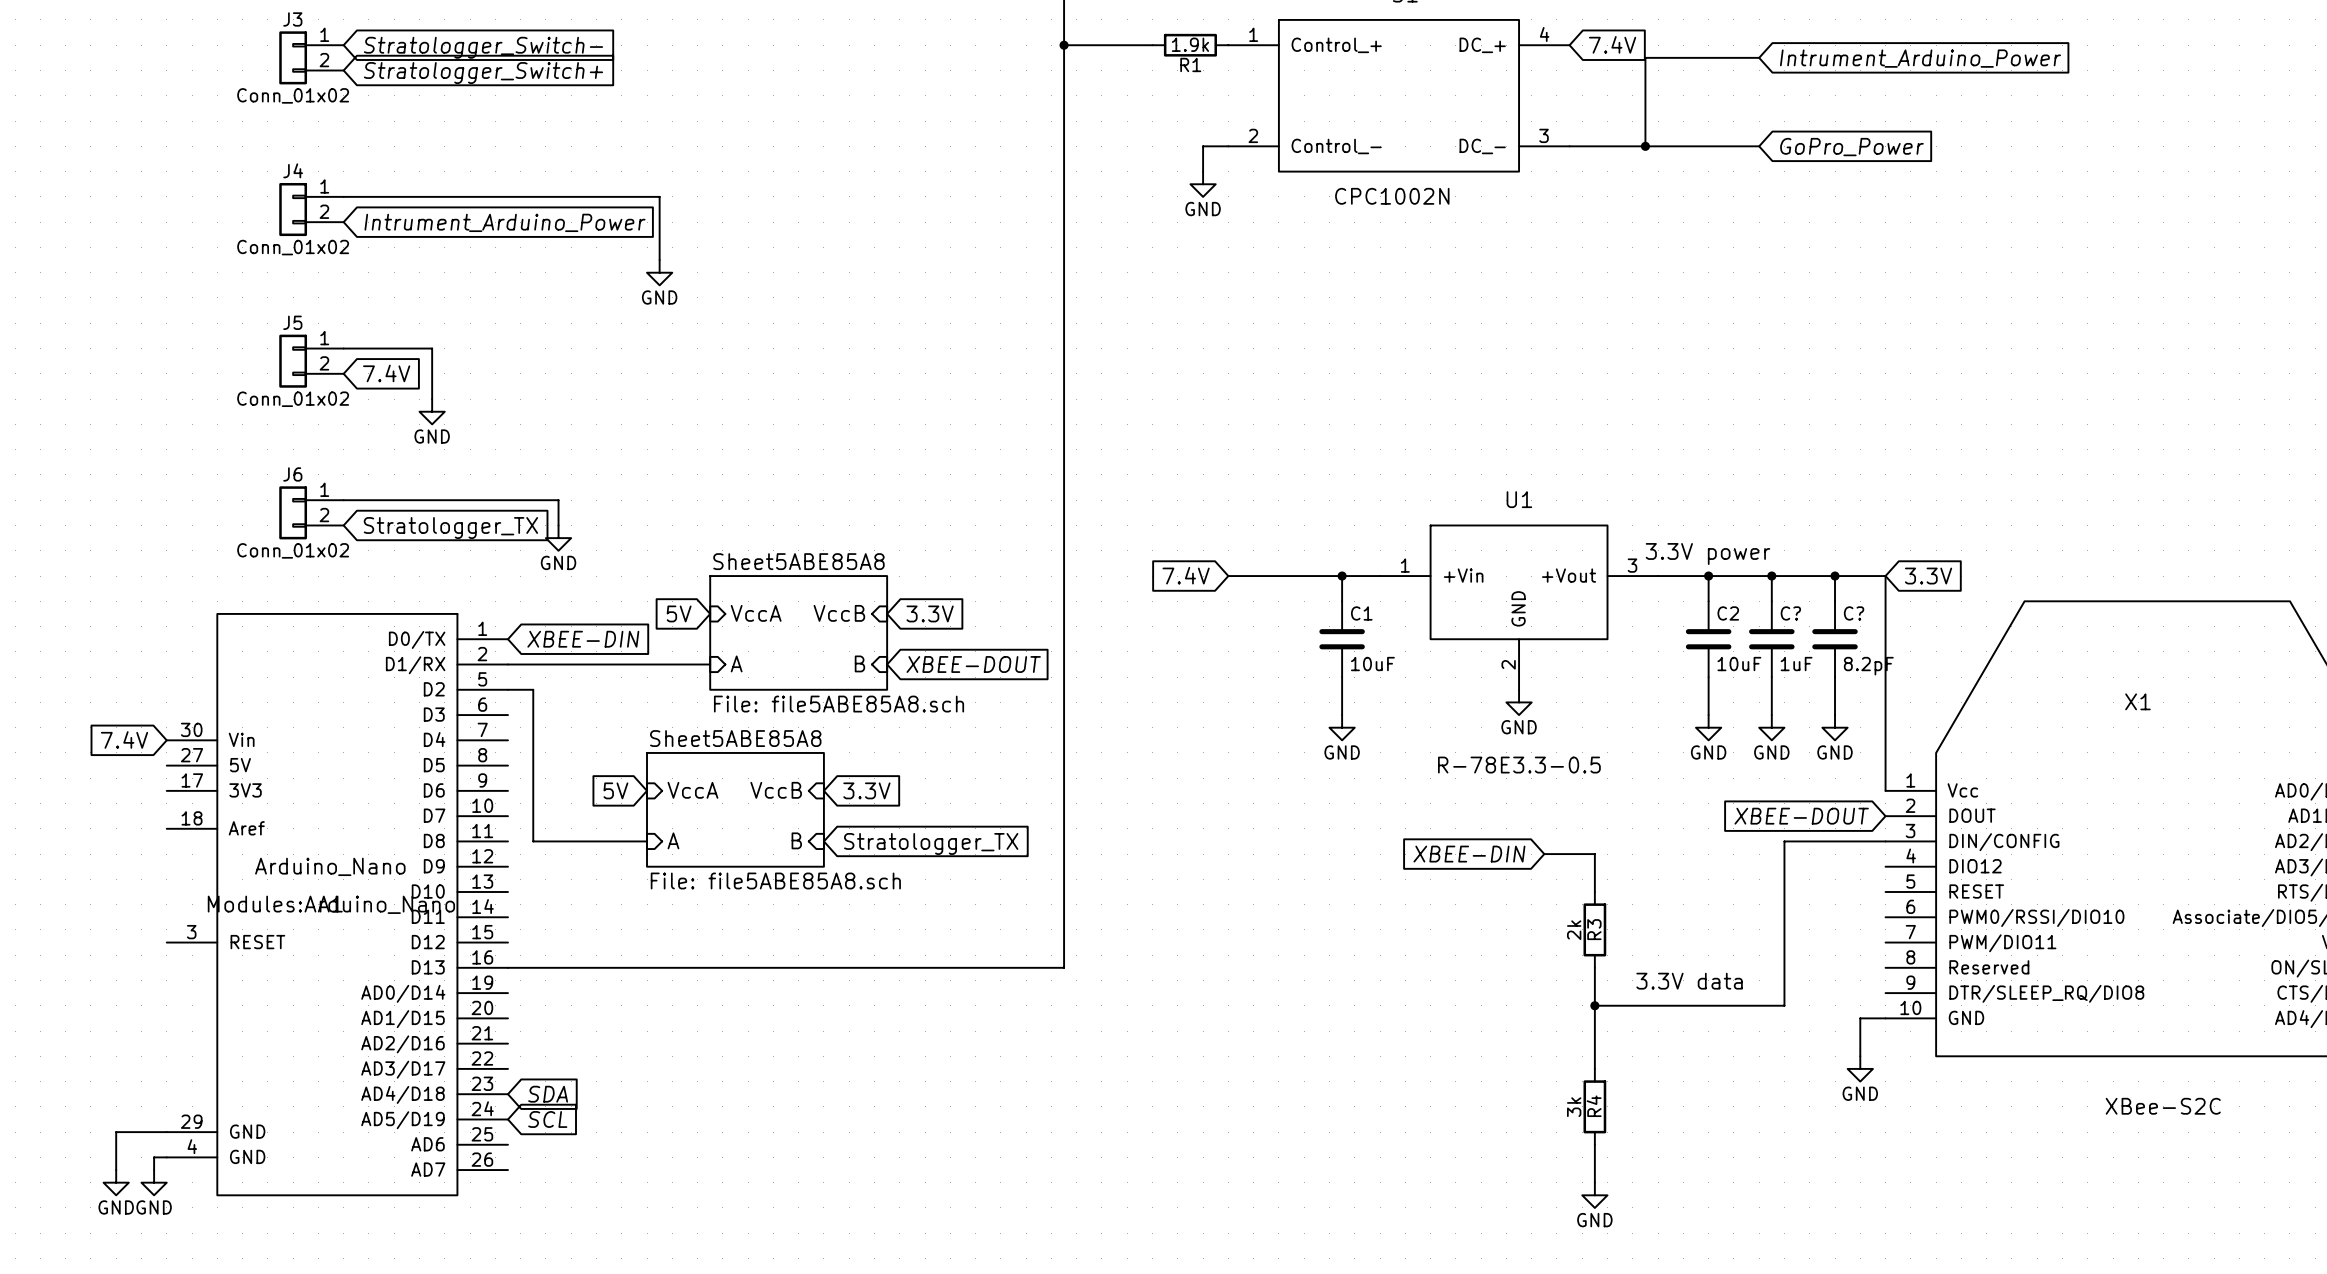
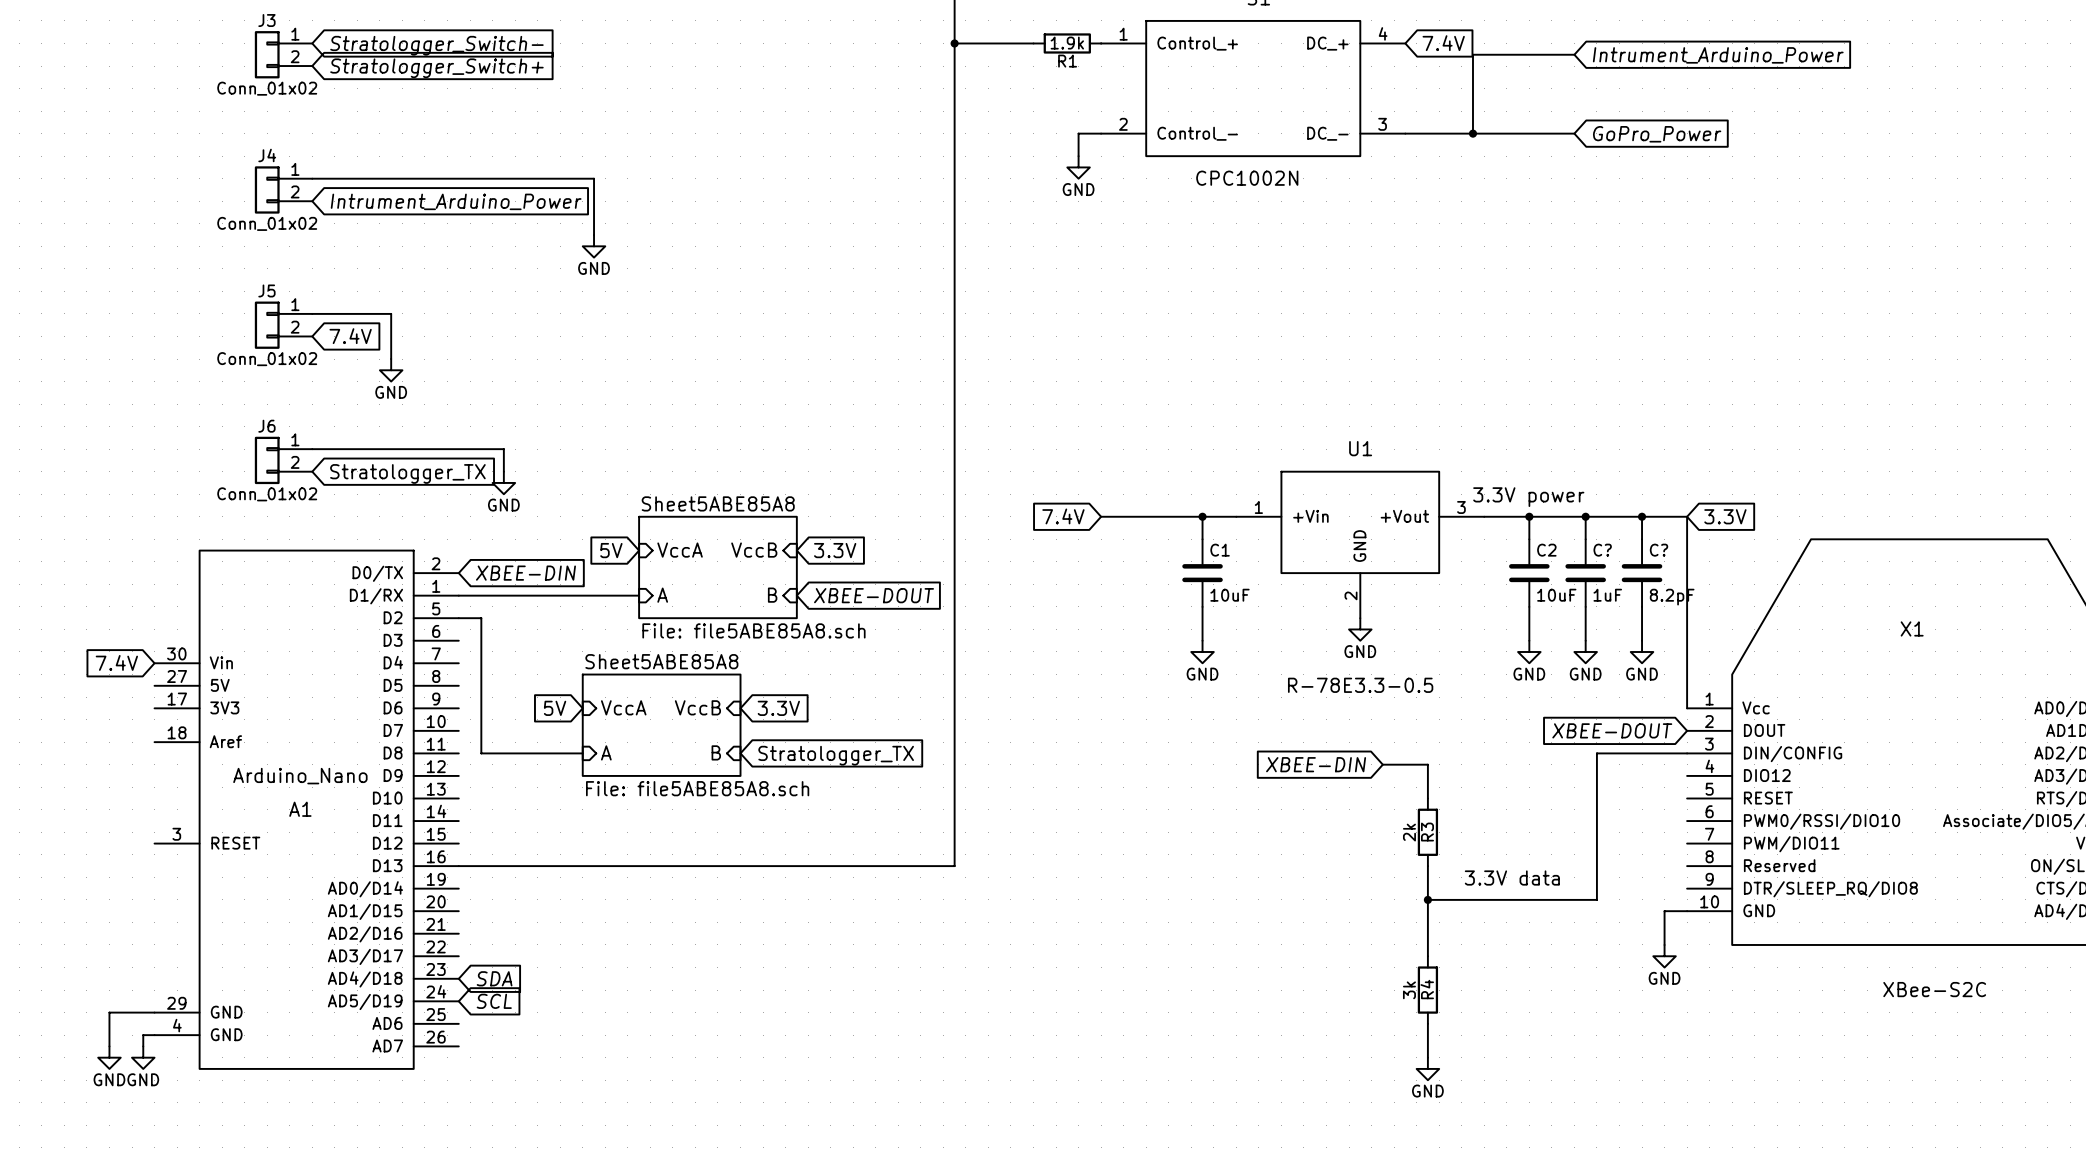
A1 pin number: 1 (482, 628) -> 2 (435, 563)
A1 pin number: 2 (482, 654) -> 1 (436, 586)
A1 text: Modules:Arduino_Nano (331, 904) -> none

